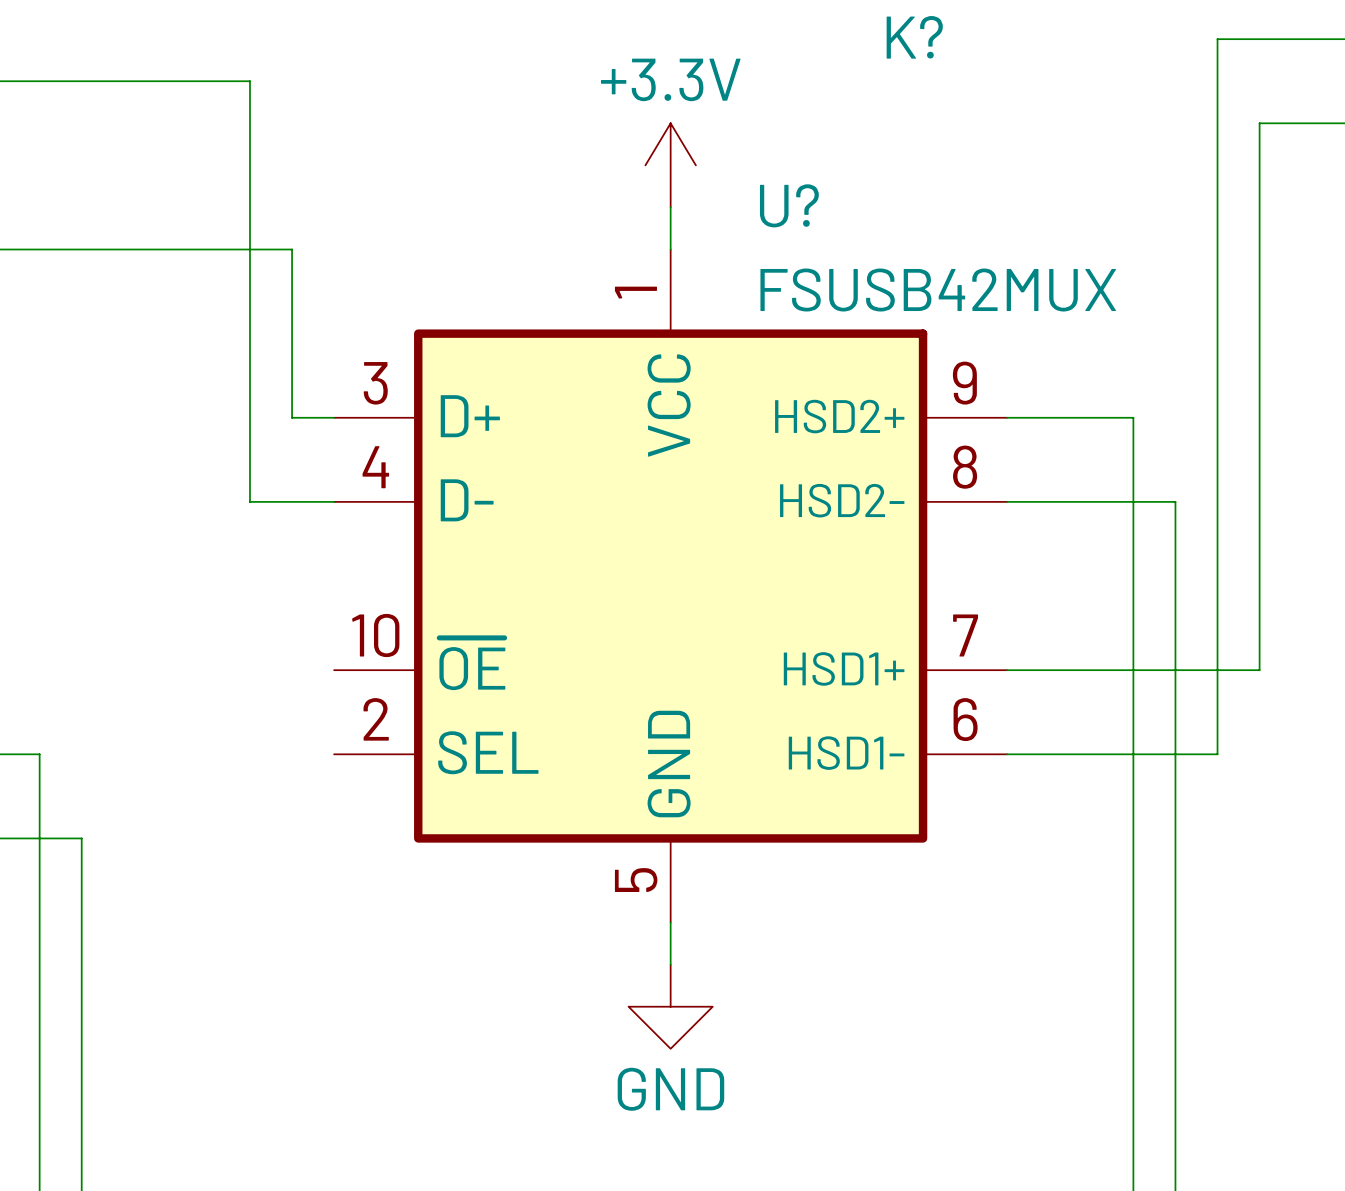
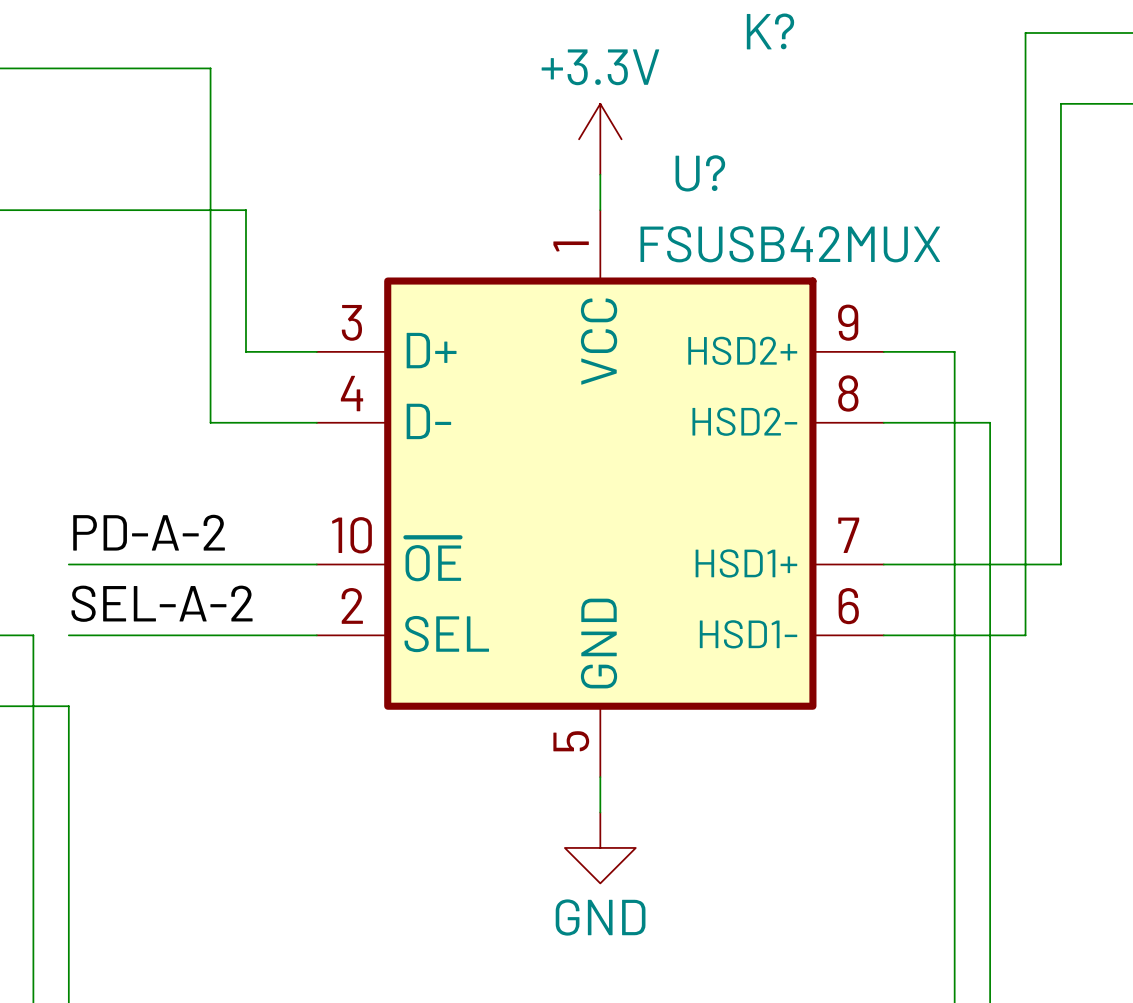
power symbol position: +3.3V (670, 165) -> +3.3V (600, 139)
wire: (670, 207) (670, 249) -> (600, 174) (600, 210)
U? position: (670, 586) -> (600, 493)
label: none -> PD-A-2 (149, 532)
wire: none -> (68, 564) (316, 564)
label: none -> SEL-A-2 (162, 603)
wire: none -> (68, 635) (316, 635)
wire: (670, 922) (670, 964) -> (600, 777) (600, 812)
power symbol position: GND (670, 1006) -> GND (600, 847)

